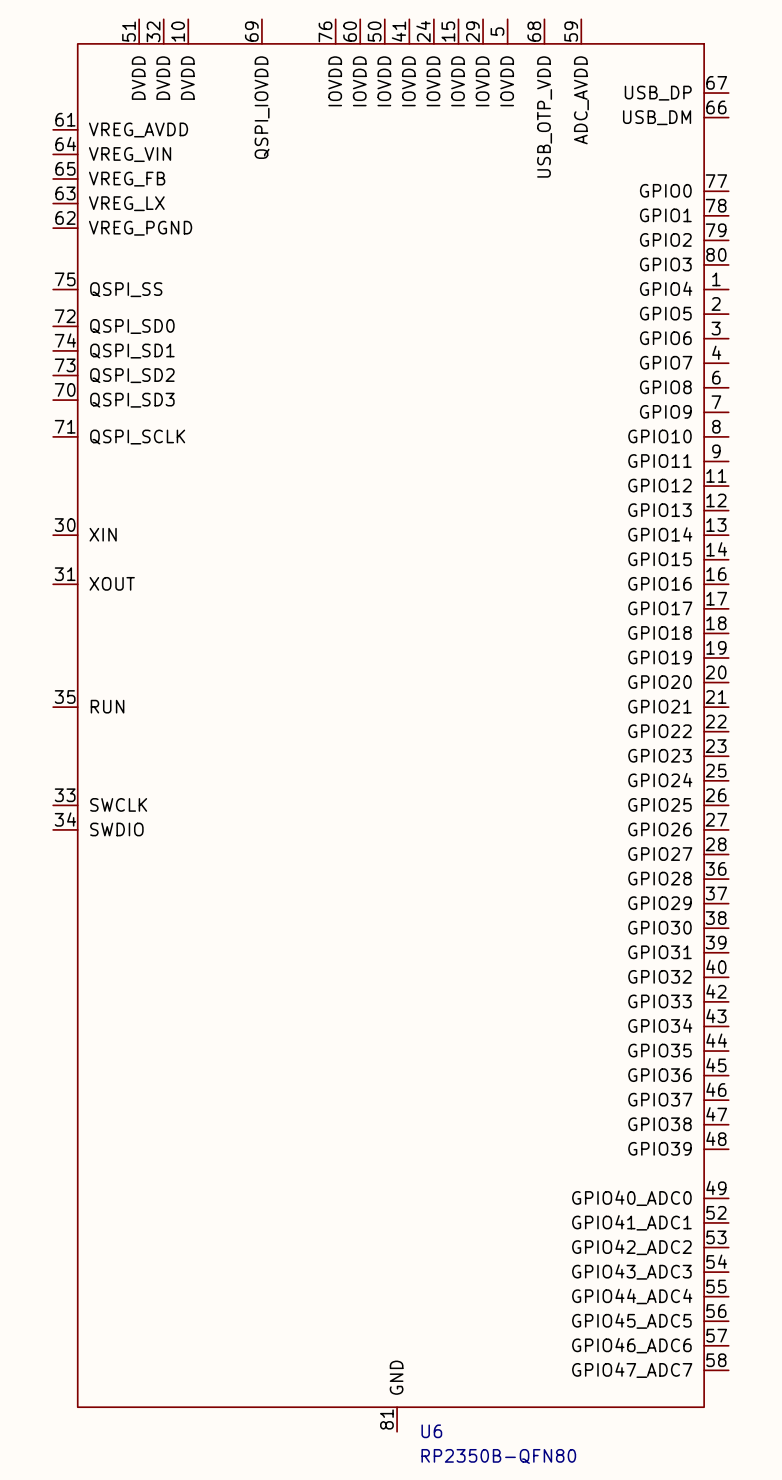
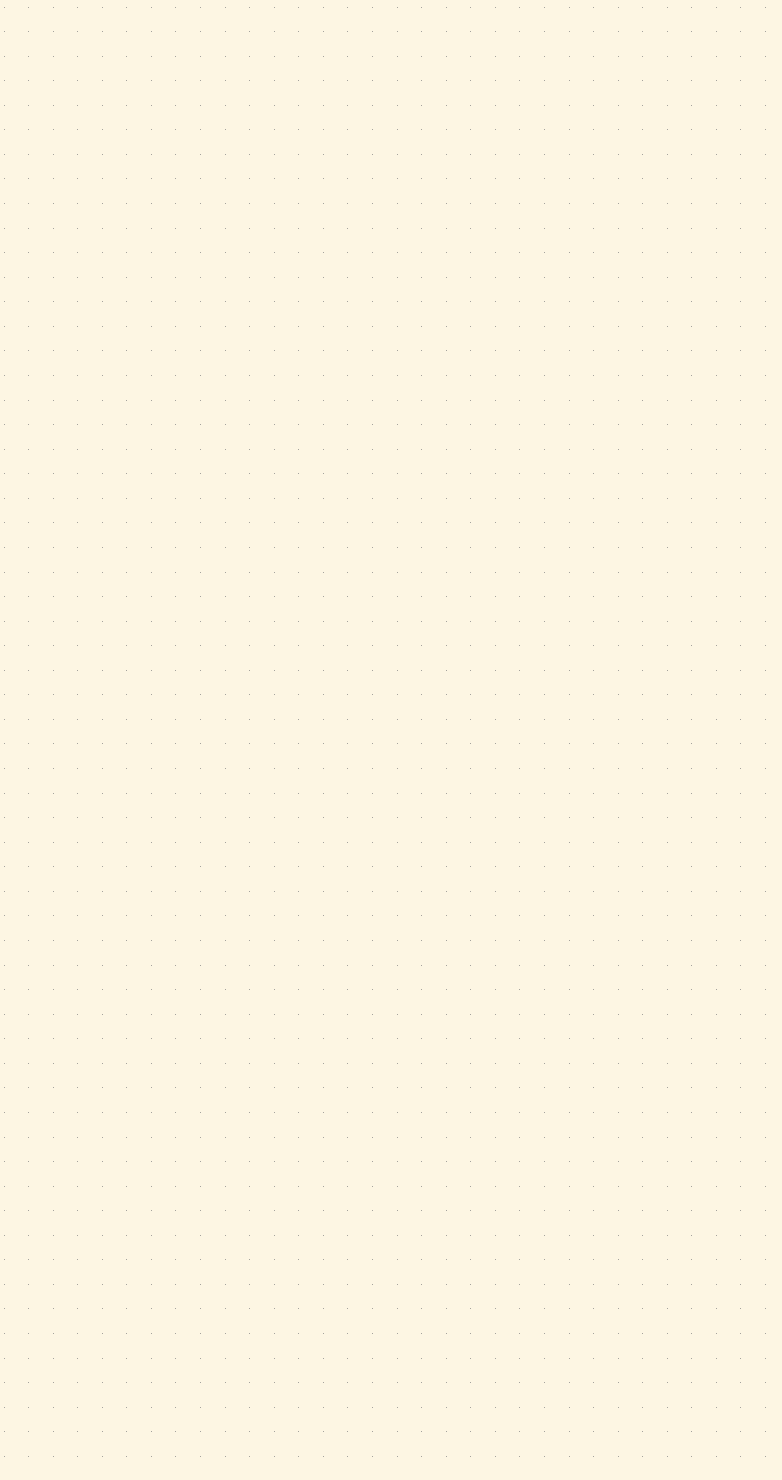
U6: RP2350B-QFN80 (390, 725) -> none

